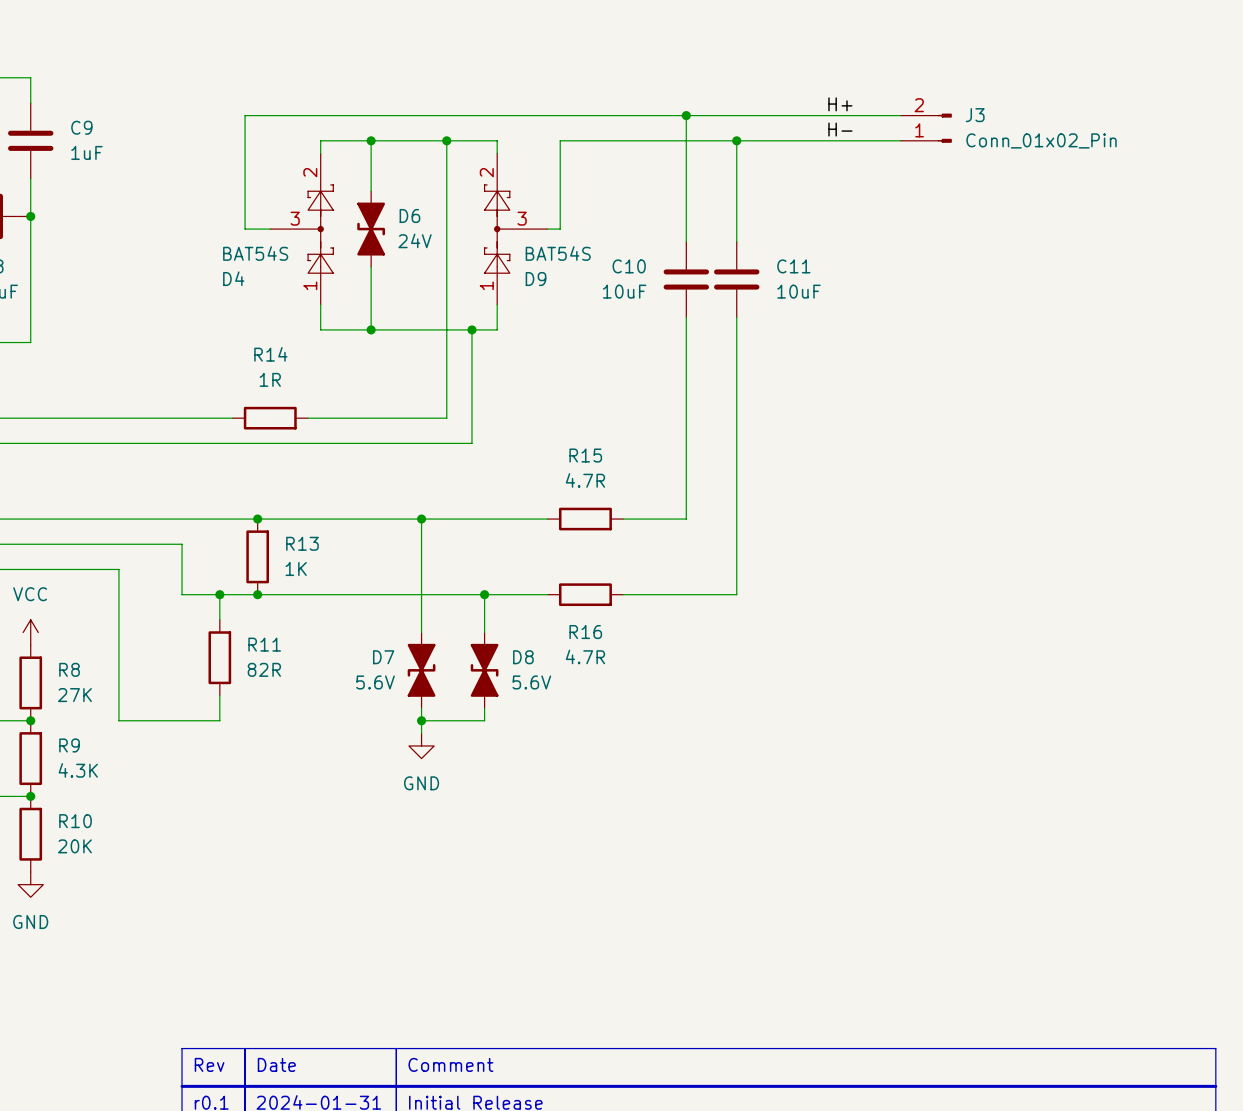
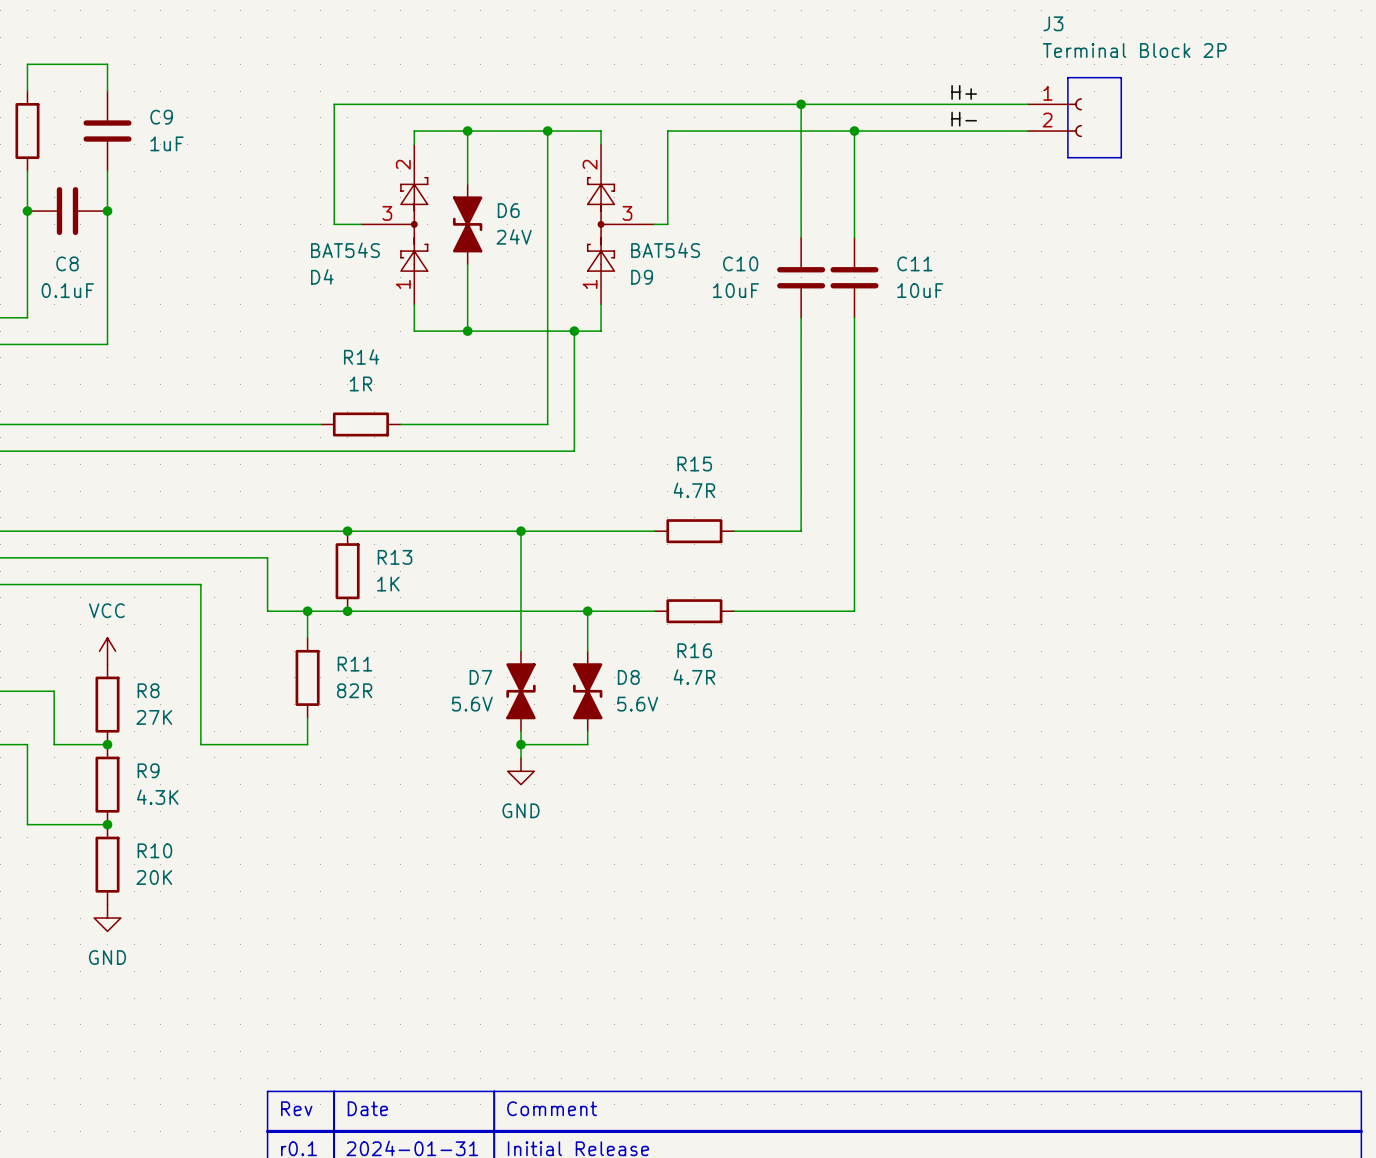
line: none -> (1067, 77) (1121, 77) (1121, 157) (1067, 157) (1067, 77)
J3 symbol: [900, 113, 952, 143] -> [1027, 98, 1083, 138]
J3 name position: J3 (975, 115) -> J3 (1053, 23)
J3 value: Conn_01x02_Pin (1041, 140) -> Terminal Block 2P (1134, 50)

